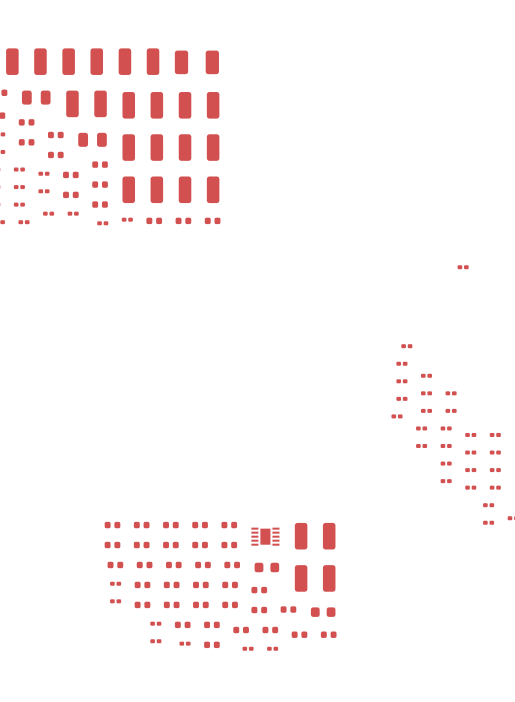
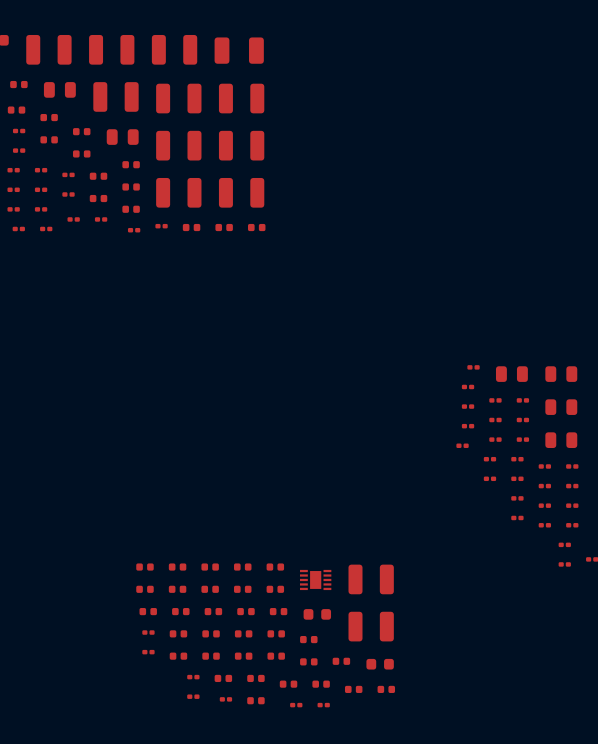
part position: (463, 267) -> (522, 400)
part: none -> (511, 374)
part: none -> (561, 374)
part: none -> (561, 407)
part: none -> (561, 440)

